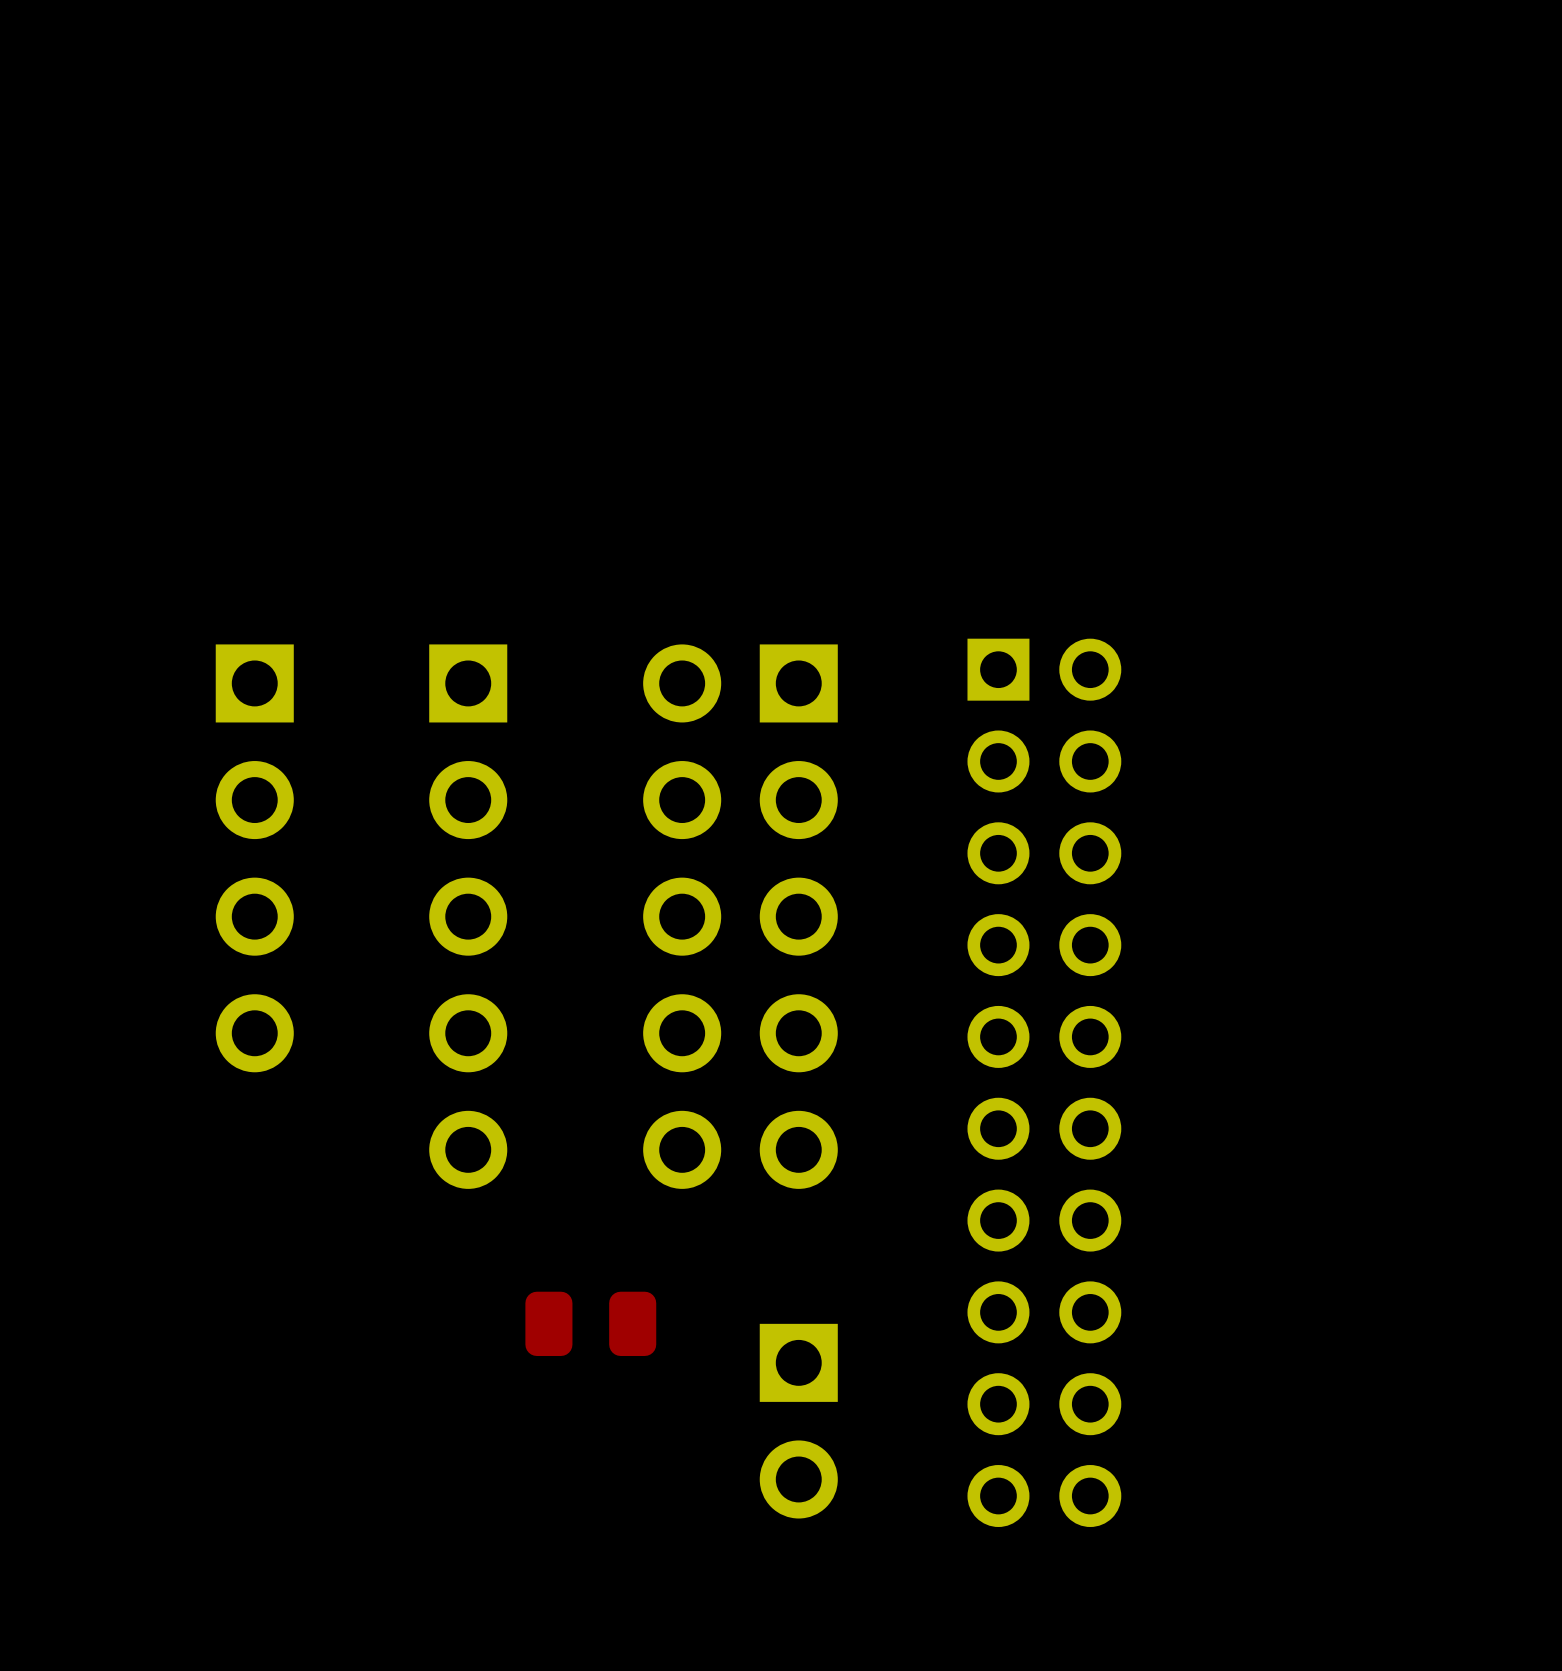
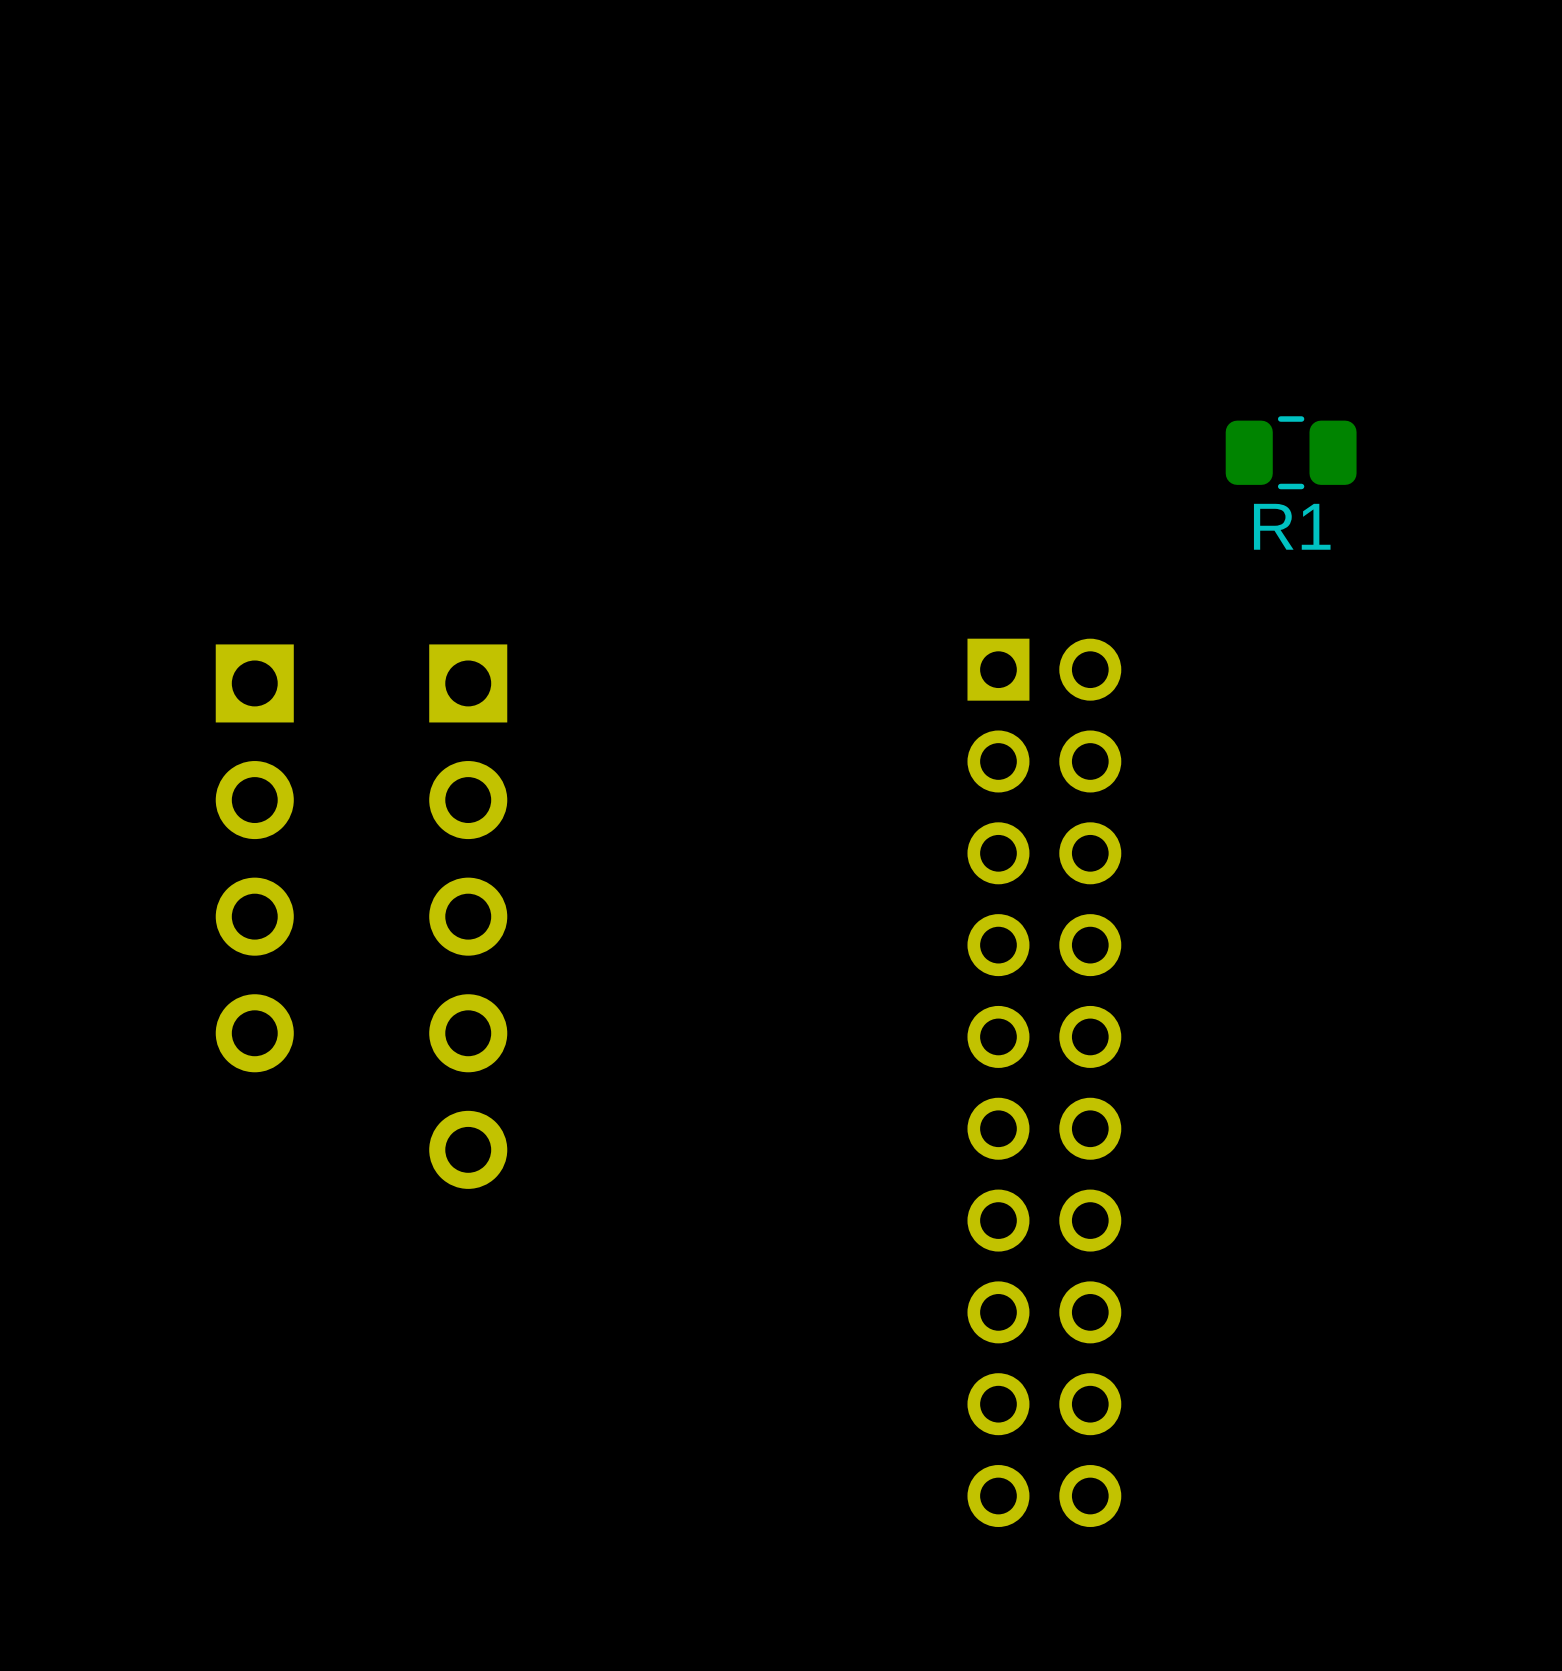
part: (740, 916) -> none
R1 side: top (590, 1323) -> bottom (1291, 452)
part: (798, 1421) -> none

